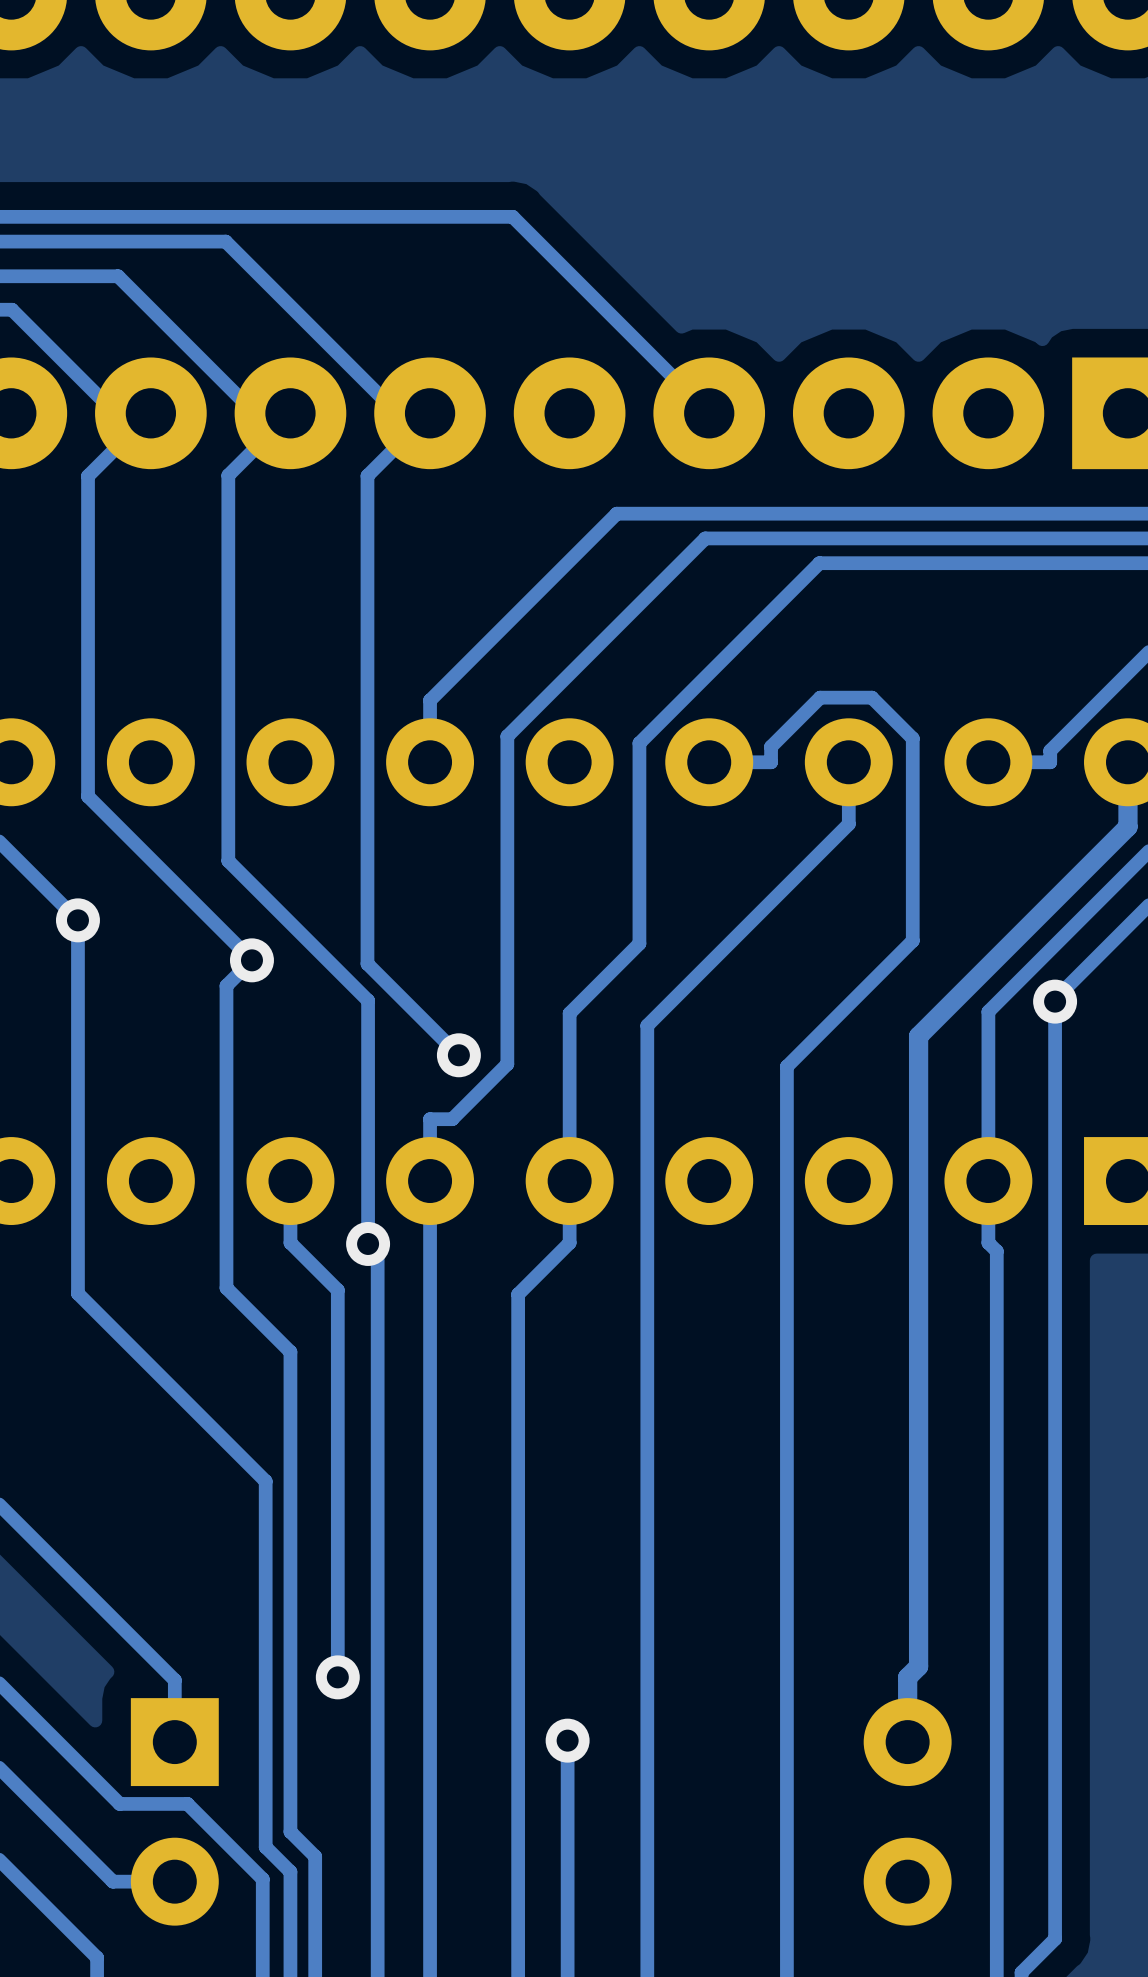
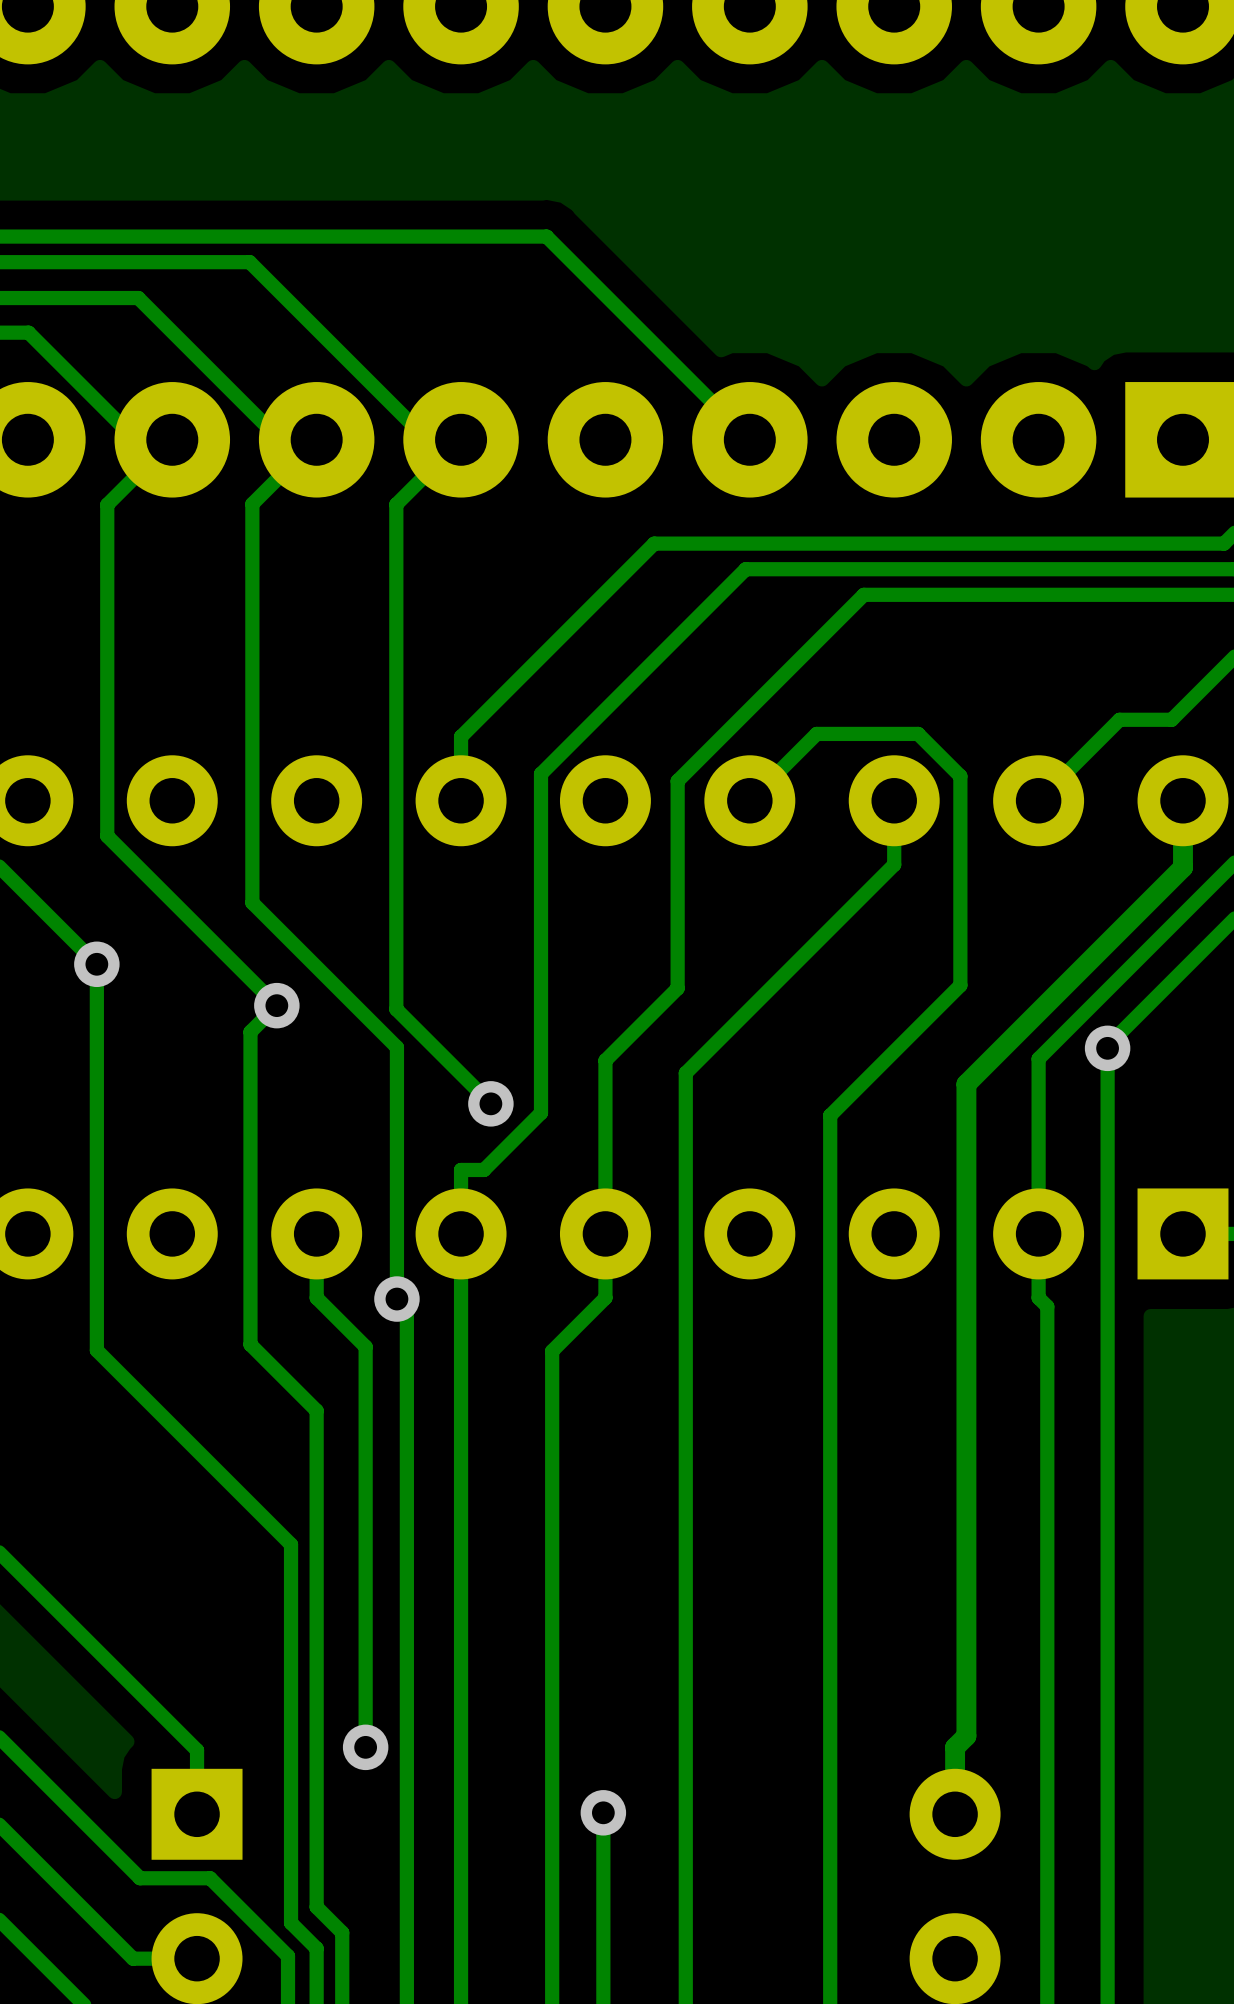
track: (1117, 683) (1050, 750) (1050, 762) (988, 762) -> (1171, 719) (1119, 719) (1038, 800)
track: (820, 697) (771, 746) (771, 762) (709, 762) -> (864, 733) (816, 733) (749, 800)

